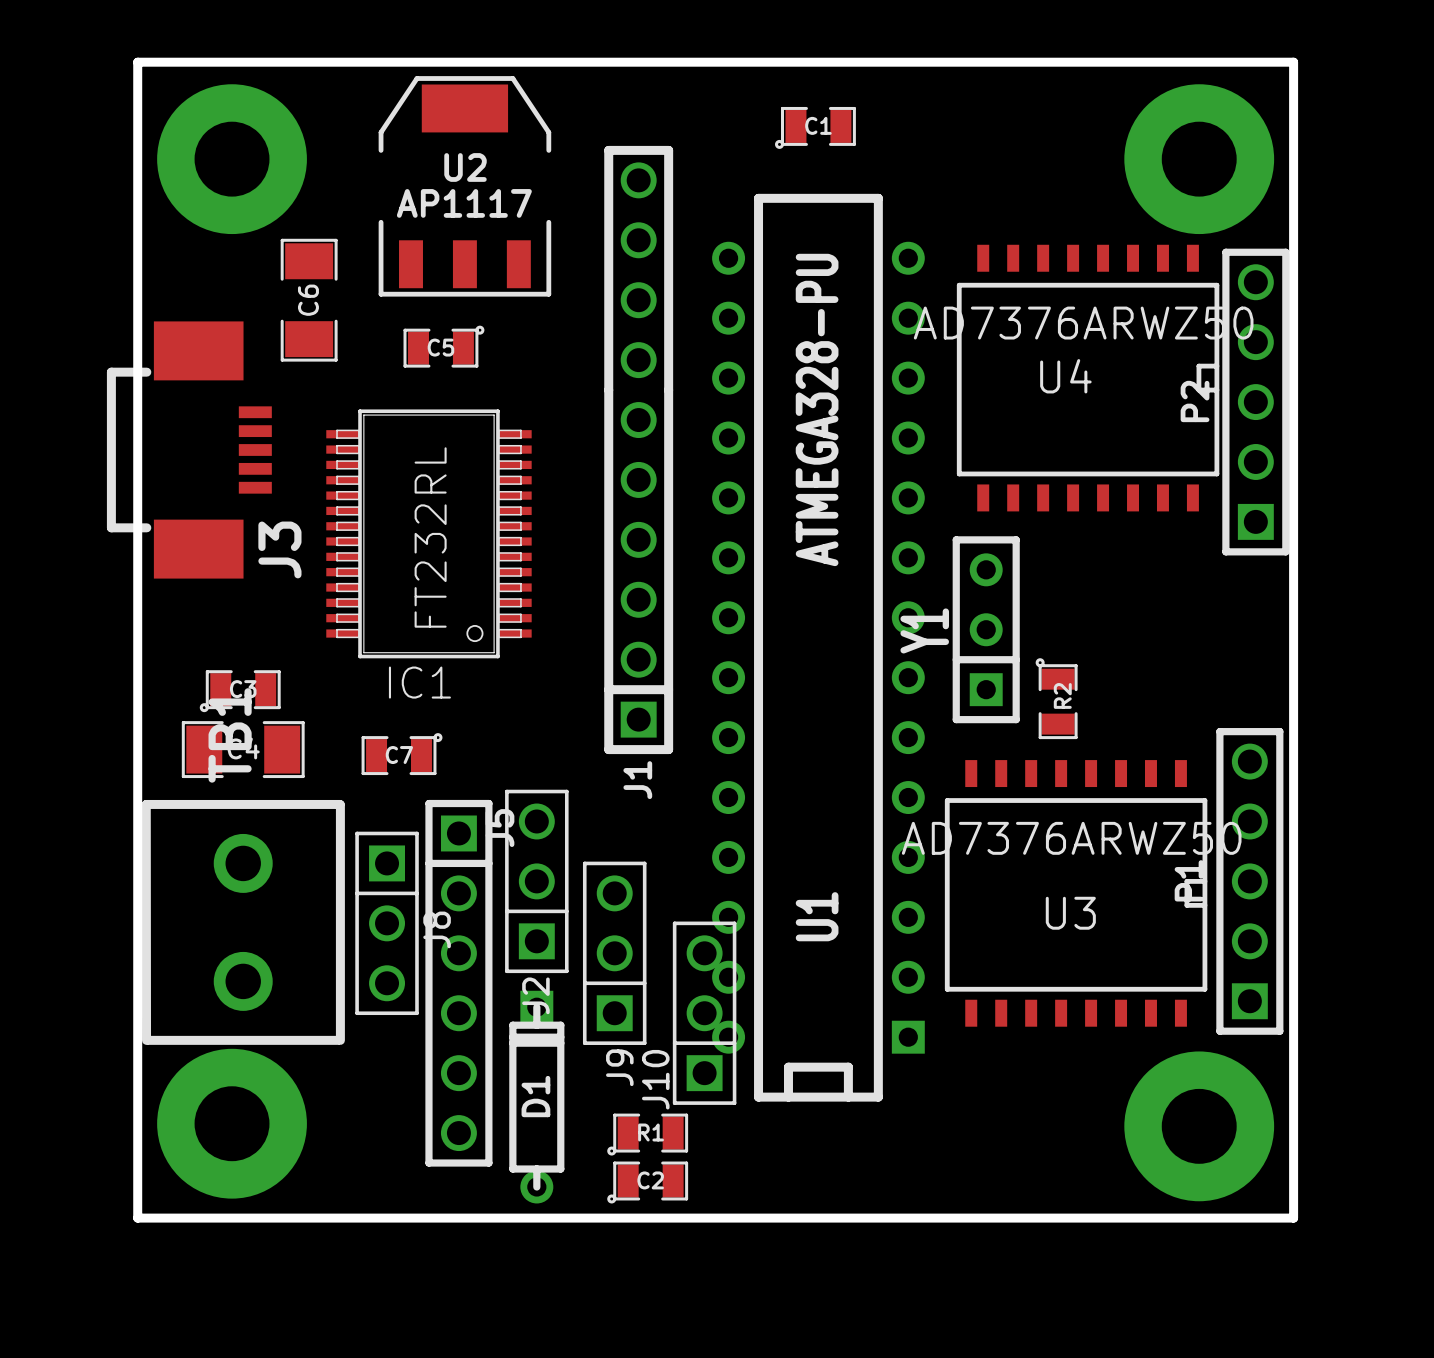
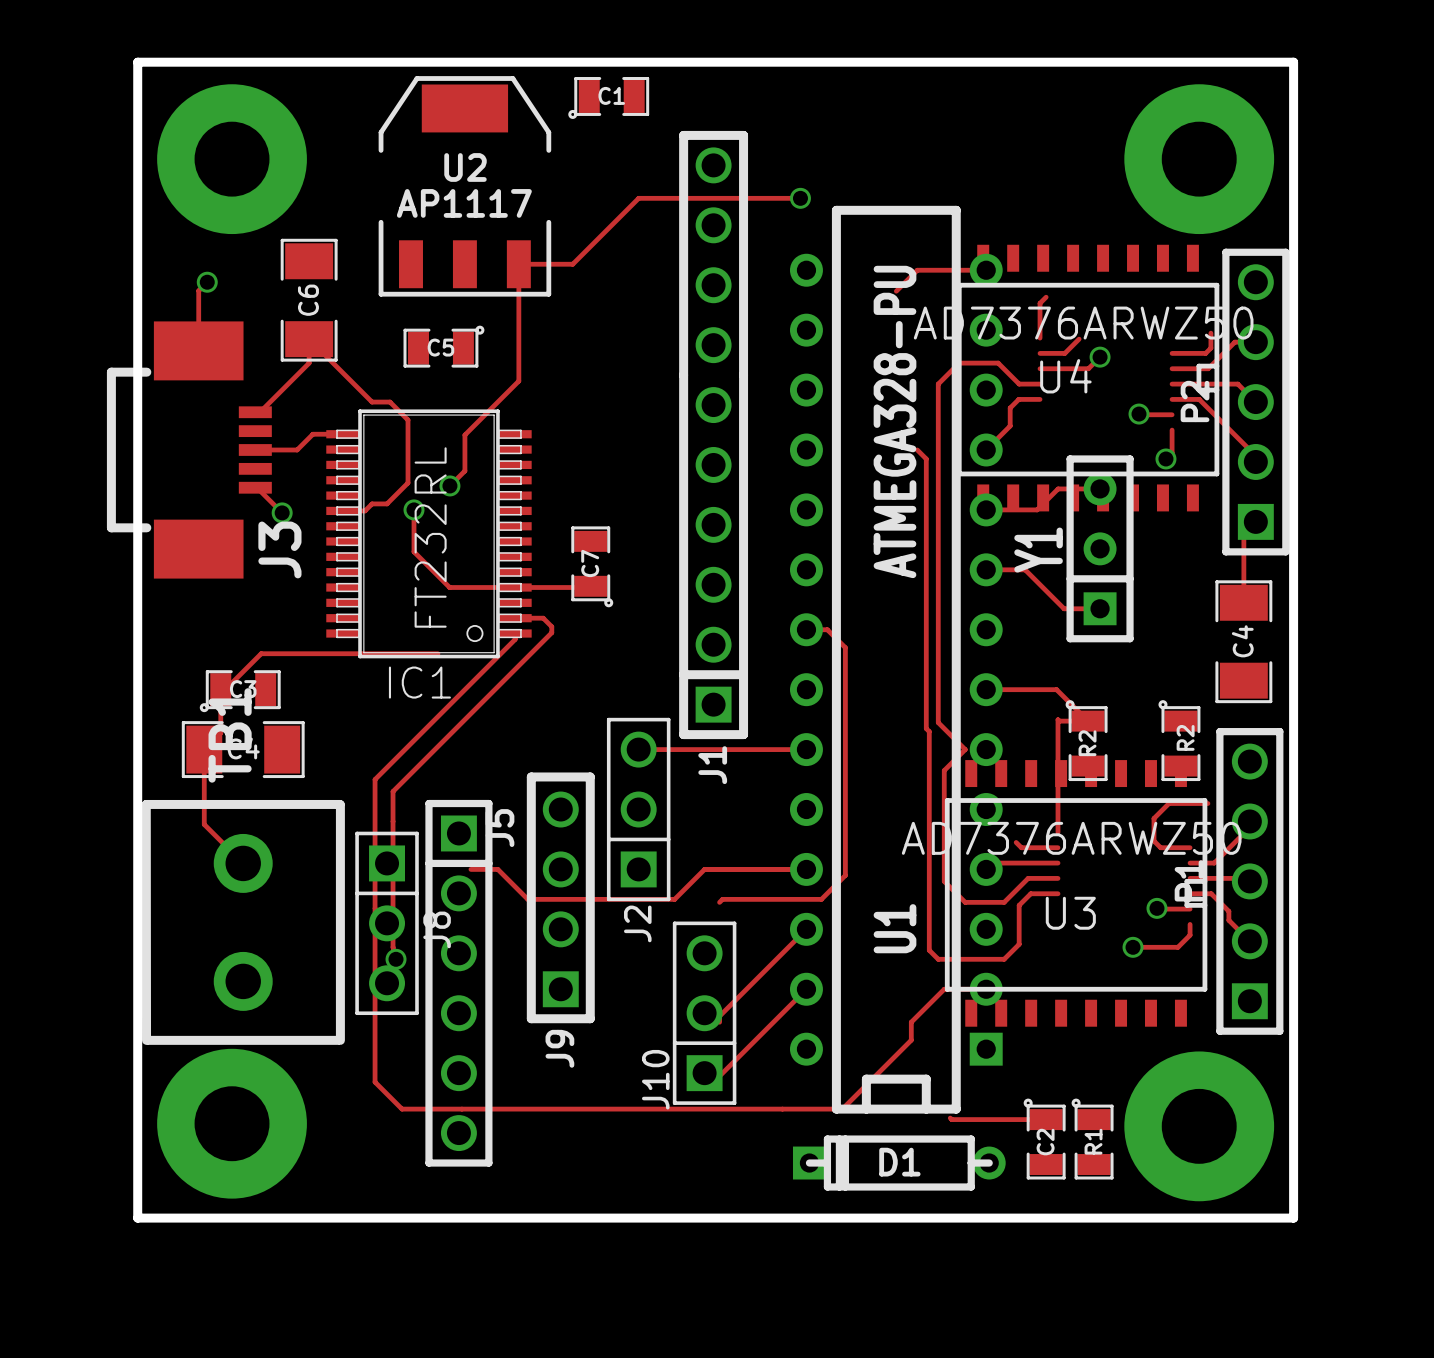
C1 position: (815, 127) -> (608, 97)
track: none -> (800, 198) (638, 198) (572, 264) (518, 264) (518, 381) (464, 435) (464, 470) (449, 485)
via: none -> (800, 198)
track: none -> (986, 270) (917, 270) (896, 291)
track: none -> (207, 282) (198, 290) (198, 350)
via: none -> (207, 282)
track: none -> (1046, 297) (1040, 303) (1040, 338)
track: none -> (1210, 333) (1210, 348) (1205, 353) (1172, 353)
track: none -> (1079, 339) (1064, 353) (1040, 353)
track: none -> (1255, 342) (1234, 342) (1208, 368) (1172, 368)
track: none -> (1100, 357) (1088, 368) (1040, 368)
via: none -> (1100, 357)
track: none -> (1040, 384) (1019, 384) (998, 363) (959, 363) (938, 384) (938, 722) (965, 749) (944, 770) (944, 881) (965, 902) (1004, 902) (1028, 878) (1058, 878)
track: none -> (1172, 384) (1237, 384) (1255, 402)
track: none -> (1040, 399) (1018, 399) (1010, 408) (1010, 426) (986, 449)
track: none -> (1172, 399) (1199, 399) (1255, 455) (1255, 461)
track: none -> (255, 412) (260, 412) (309, 363) (309, 339) (372, 402) (390, 402) (408, 420) (408, 482) (387, 503) (372, 503) (365, 510) (342, 510)
track: none -> (1139, 414) (1172, 414)
via: none -> (1139, 414)
track: none -> (1172, 430) (1172, 452) (1165, 458)
track: none -> (342, 434) (312, 434) (297, 449) (255, 449)
J1 position: (638, 449) -> (713, 435)
track: none -> (917, 449) (926, 458) (926, 728) (929, 731) (929, 950) (938, 959) (1004, 959) (1019, 944) (1019, 905) (1030, 893) (1058, 893)
via: none -> (1165, 458)
via: none -> (449, 485)
track: none -> (255, 487) (282, 512)
track: none -> (1100, 488) (1058, 488) (1037, 509) (986, 509)
track: none -> (414, 509) (414, 551) (449, 587) (590, 586)
via: none -> (414, 509)
via: none -> (282, 512)
track: none -> (1255, 521) (1243, 533) (1243, 602)
track: none -> (986, 569) (1025, 569) (1064, 608) (1100, 608)
track: none -> (515, 618) (543, 618) (551, 626) (551, 632) (393, 791) (393, 947) (396, 959)
track: none -> (806, 629) (827, 629) (845, 647) (845, 875) (821, 899) (722, 899) (719, 902)
Y1 position: (986, 629) -> (1100, 548)
track: none -> (515, 633) (515, 639) (375, 779) (375, 1082) (402, 1109) (842, 1109) (911, 1040) (911, 1022) (944, 989) (986, 989)
C4: none -> (1243, 641)
U1 position: (818, 647) -> (896, 659)
track: none -> (437, 653) (261, 653) (225, 689) (220, 689) (220, 733) (204, 749) (204, 824) (243, 863)
track: none -> (986, 689) (1056, 689) (1088, 721) (1058, 719) (1058, 832)
R2 name position: R2 (1062, 695) -> R2 (1087, 743)
R2 position: (1056, 698) -> (1086, 740)
R2: none -> (1179, 740)
track: none -> (638, 749) (806, 749)
C7 rotation: 0° (402, 754) -> 90° clockwise (592, 566)
C7 position: (402, 754) -> (592, 566)
track: none -> (1207, 803) (1168, 803) (1153, 818) (1153, 841) (1160, 847) (1190, 847)
track: none -> (1249, 821) (1249, 827) (1214, 863) (1190, 863)
track: none -> (1016, 842) (1021, 847) (1058, 847)
J9 footprint: [582, 861, 647, 1045] -> [526, 772, 595, 1024]
track: none -> (1058, 863) (992, 863) (986, 869)
track: none -> (470, 869) (497, 869) (527, 899) (674, 899) (704, 869) (806, 869)
track: none -> (1190, 878) (1246, 878) (1249, 881)
J2 position: (536, 881) -> (638, 809)
track: none -> (1190, 893) (1211, 893) (1228, 911) (1228, 920) (1249, 941)
track: none -> (1156, 908) (1190, 909)
via: none -> (1156, 908)
track: none -> (1190, 924) (1190, 935) (1177, 947) (1133, 947)
track: none -> (806, 929) (719, 1016) (719, 1022)
via: none -> (1133, 947)
via: none -> (396, 959)
track: none -> (806, 989) (719, 1076) (719, 1082)
D1 rotation: 0° (536, 1097) -> 90° counterclockwise (899, 1163)
D1 position: (536, 1097) -> (899, 1163)
track: none -> (950, 1118) (1046, 1119)
R1 rotation: 0° (647, 1134) -> 90° clockwise (1092, 1139)
R1 position: (647, 1134) -> (1092, 1139)
C2 rotation: 0° (647, 1182) -> 90° clockwise (1044, 1139)
C2 position: (647, 1182) -> (1044, 1139)

